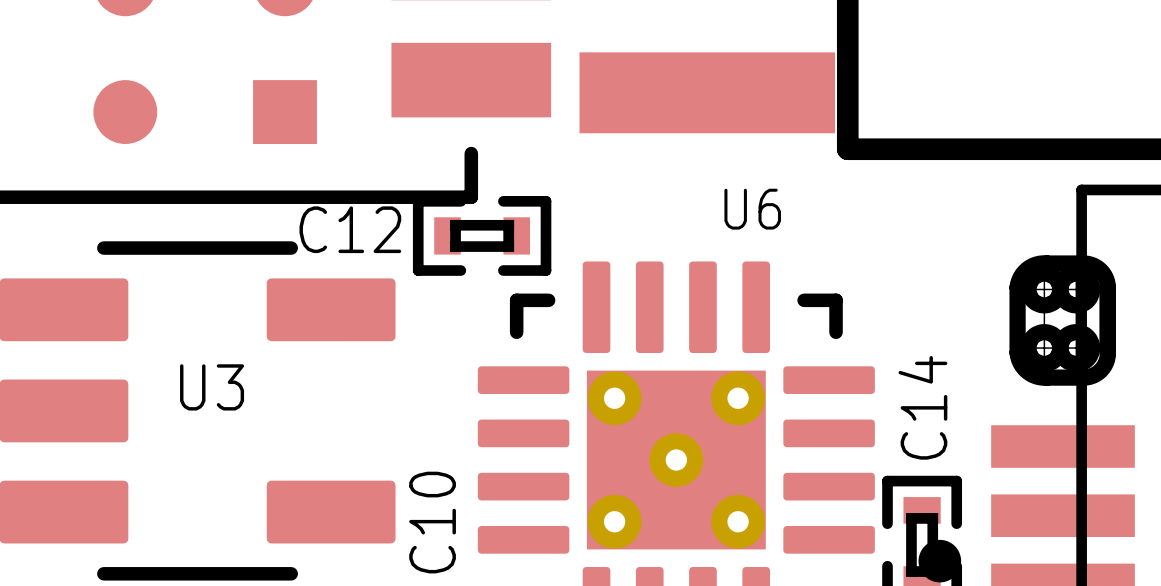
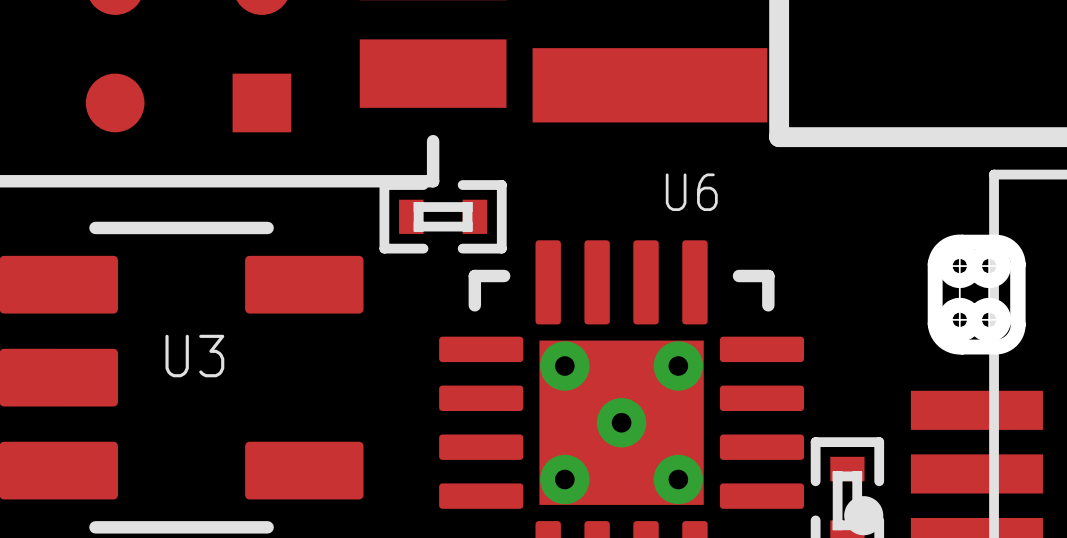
C12 name: C12 (350, 229) -> none
C14 name: C14 (922, 407) -> none
C10 name: C10 (432, 522) -> none

